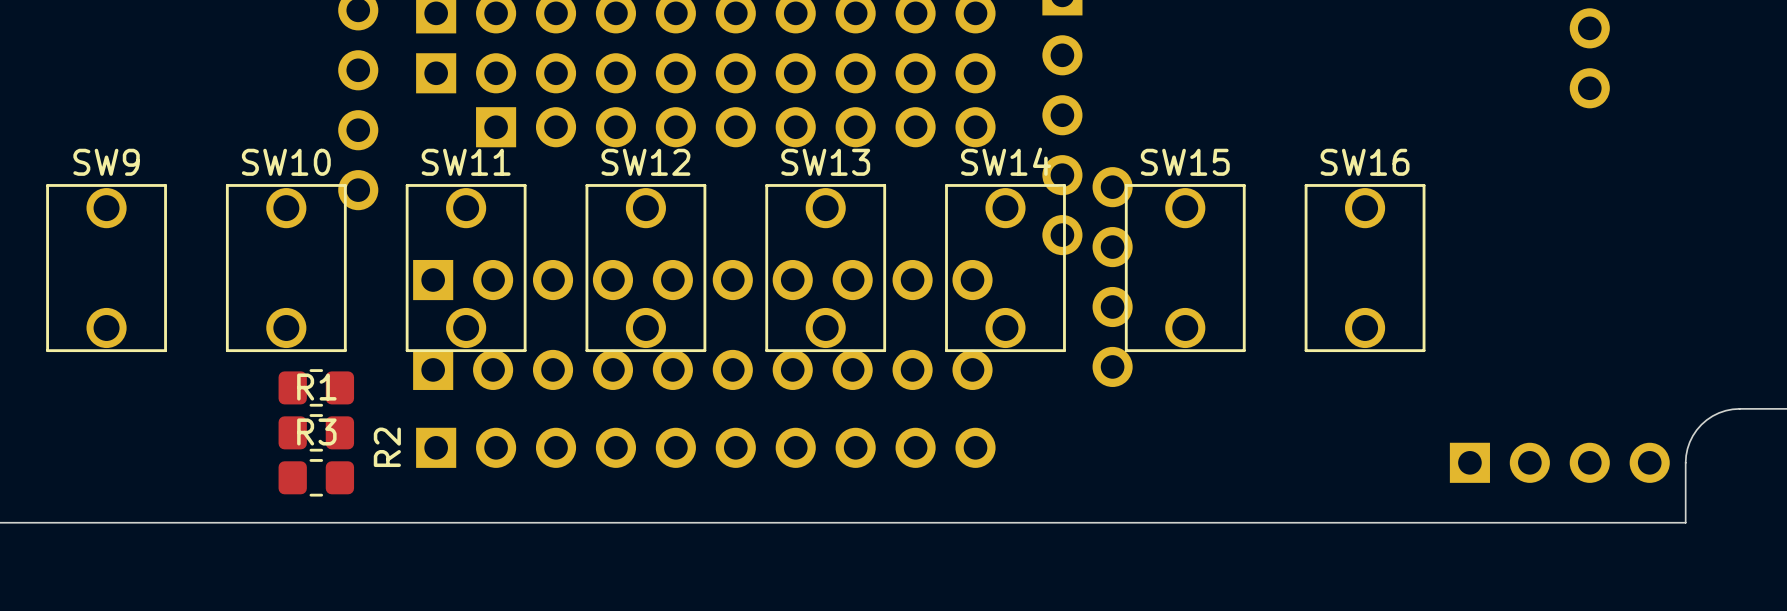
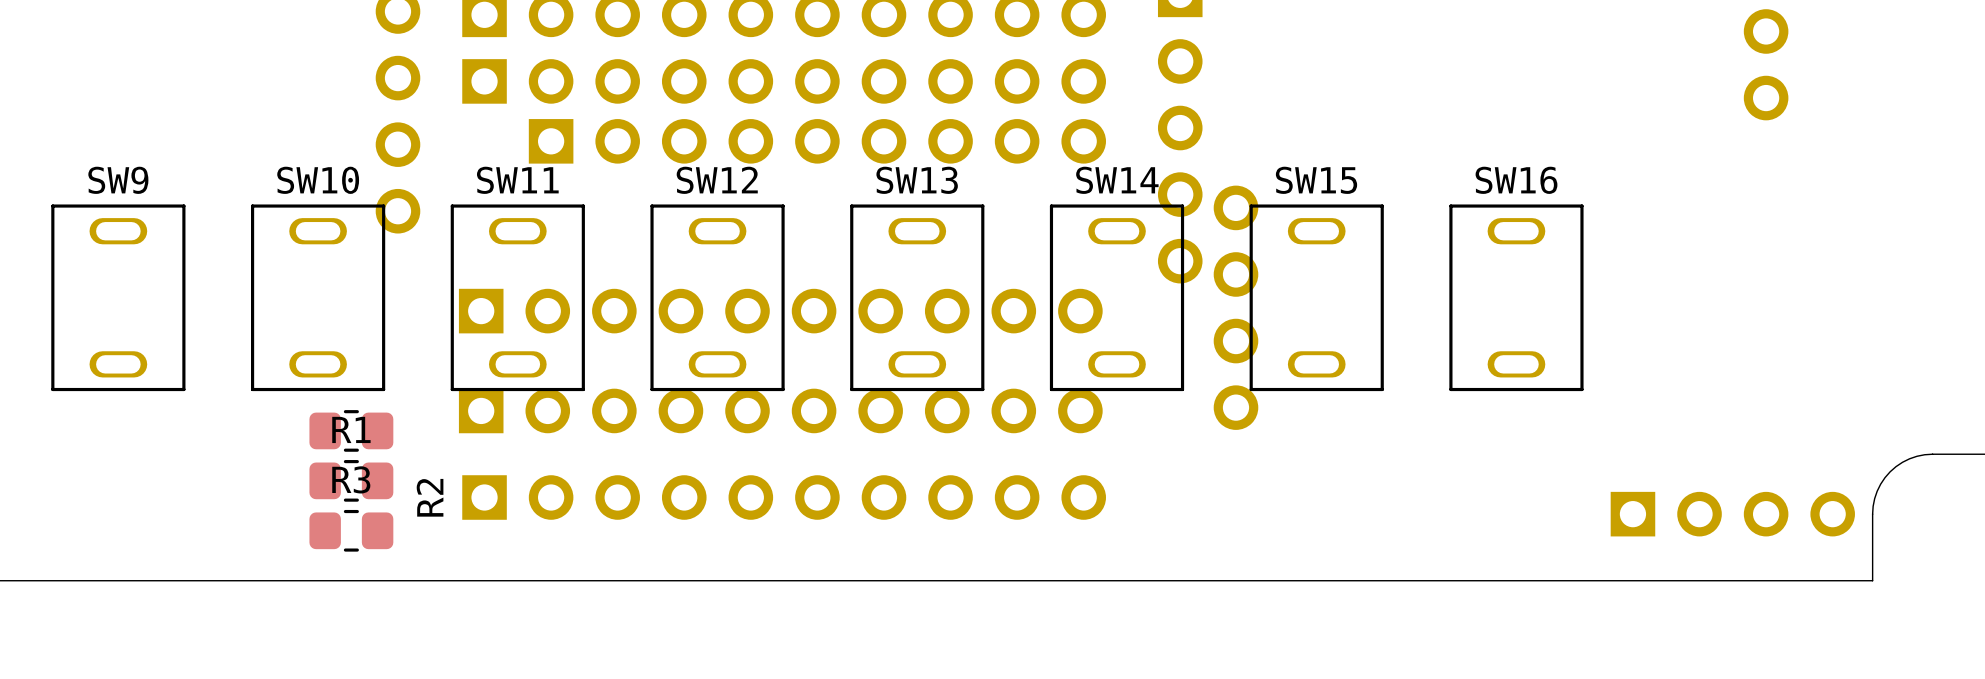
SW9 footprint: [46, 184, 167, 353] -> [51, 204, 186, 392]
SW10 footprint: [225, 184, 347, 353] -> [251, 204, 386, 392]
SW11 footprint: [405, 184, 527, 353] -> [450, 204, 585, 392]
SW12 footprint: [585, 184, 707, 353] -> [650, 204, 785, 392]
SW13 footprint: [765, 184, 887, 353] -> [850, 204, 985, 392]
SW14 footprint: [945, 184, 1066, 353] -> [1049, 204, 1185, 392]
SW15 footprint: [1124, 184, 1246, 353] -> [1249, 204, 1384, 392]
SW16 footprint: [1304, 184, 1426, 353] -> [1449, 204, 1584, 392]

